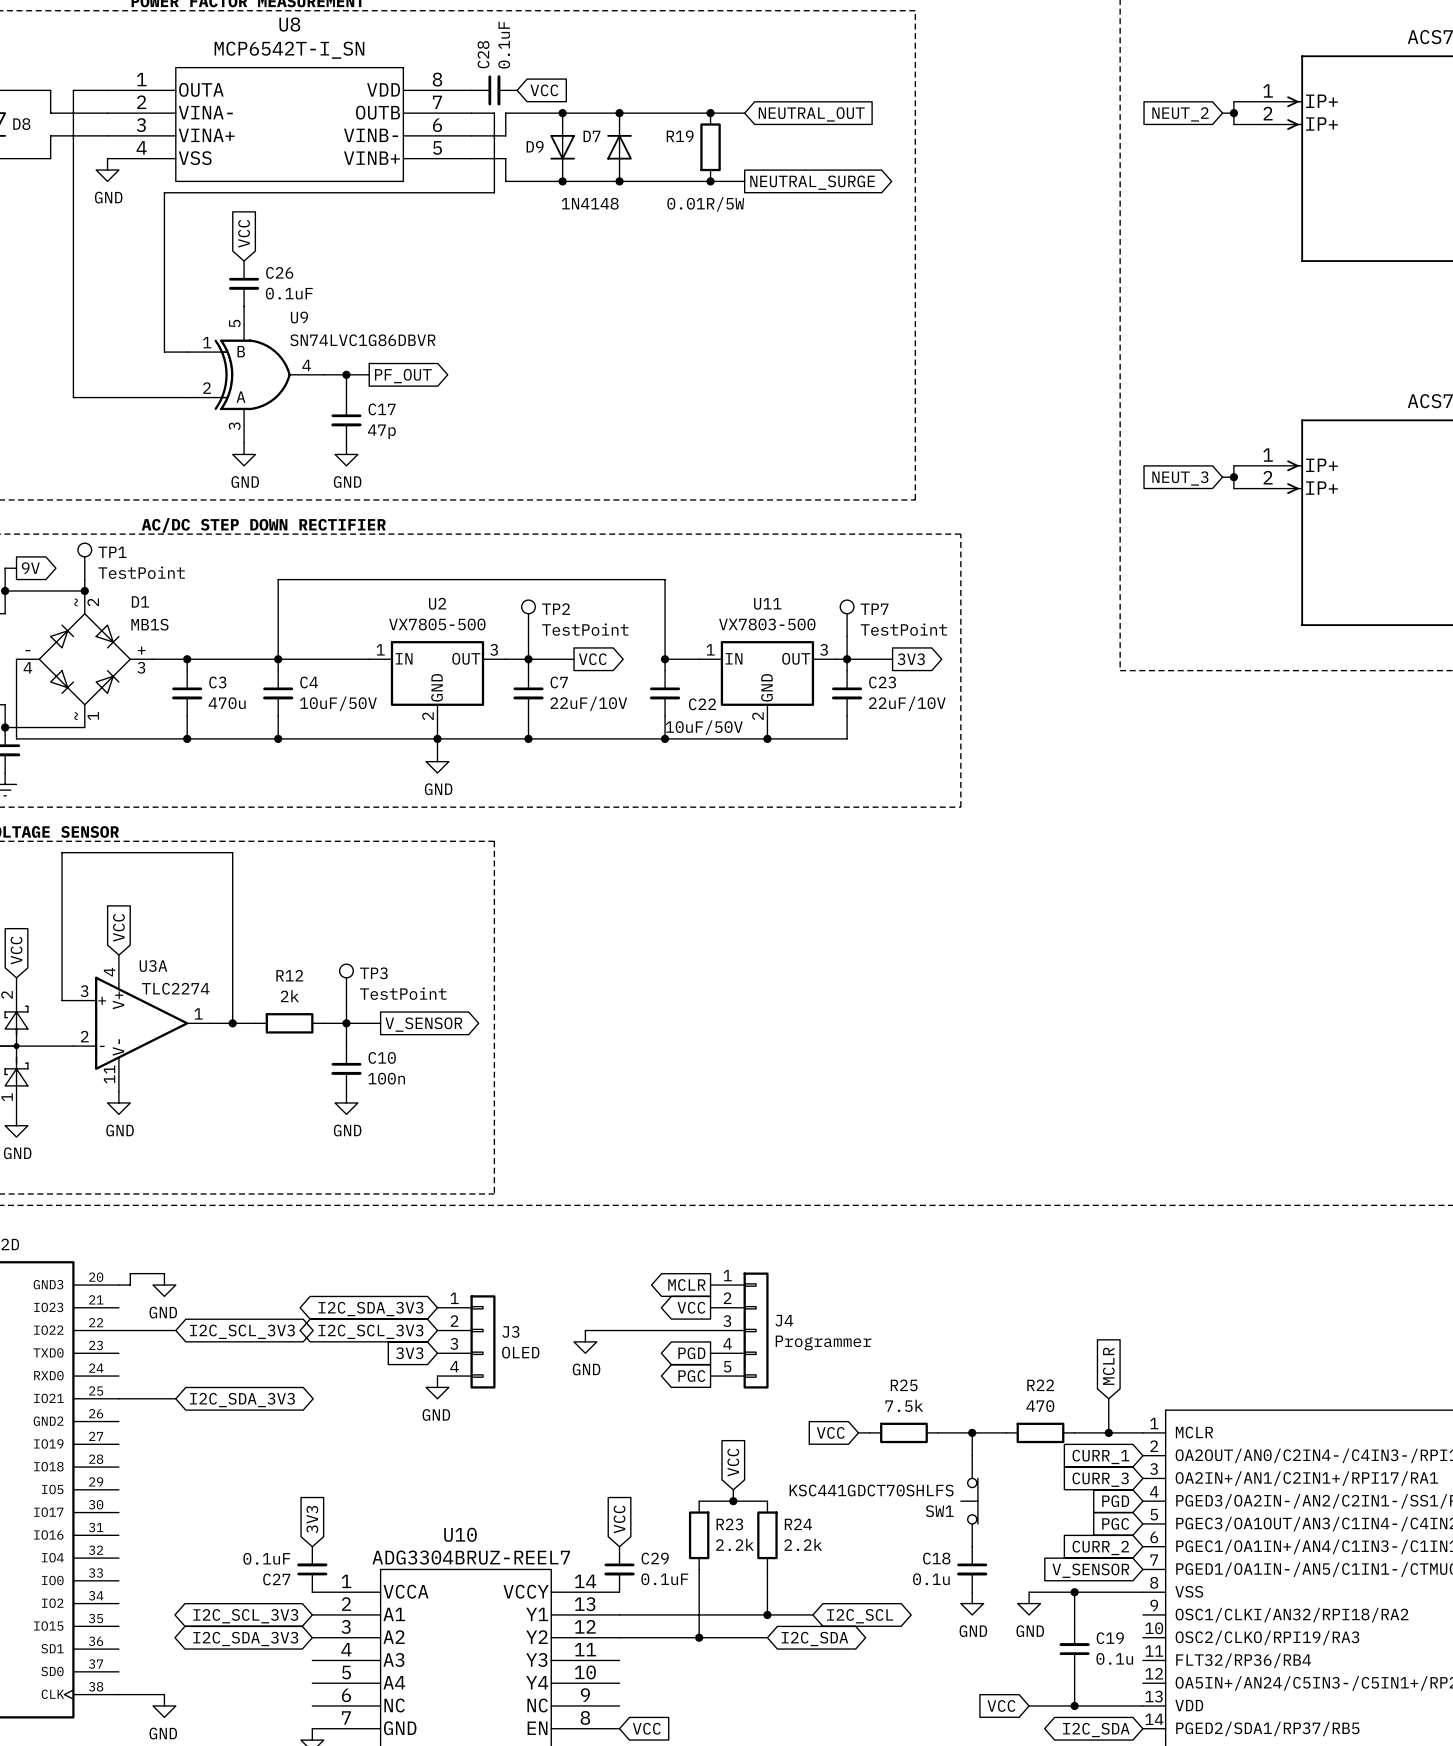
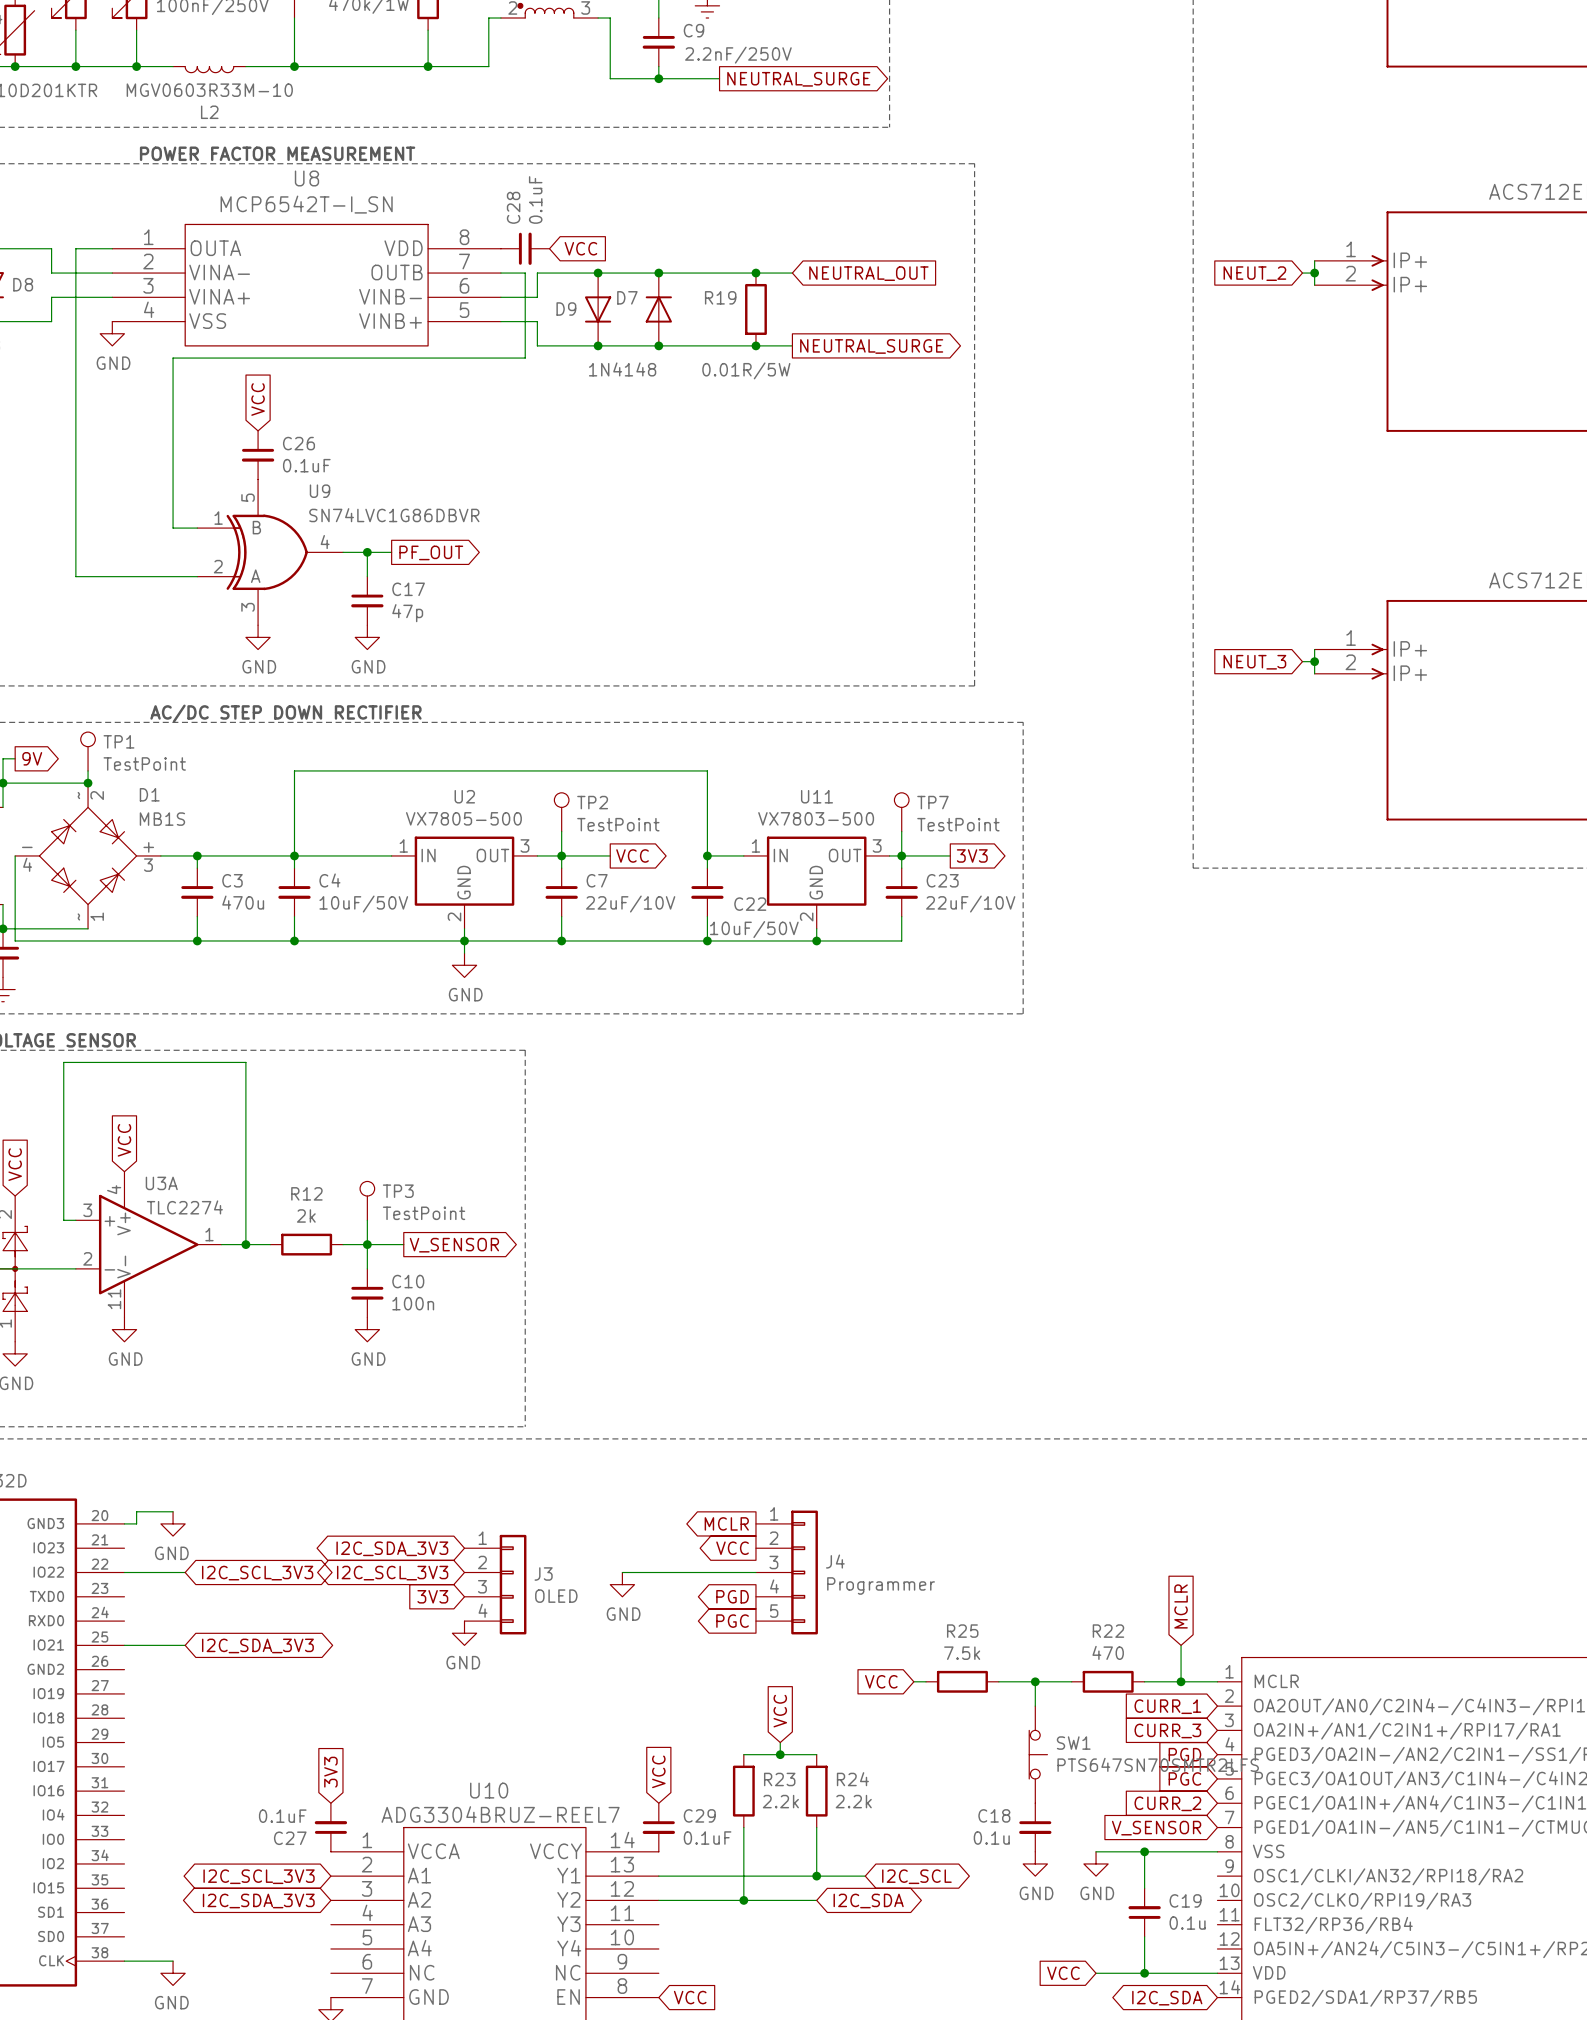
SW1 value: KSC441GDCT70SHLFS (871, 1490) -> PTS647SN70SMTR2LFS (1158, 1764)
SW1 rotation: 0° (969, 1501) -> 180° (1038, 1754)

